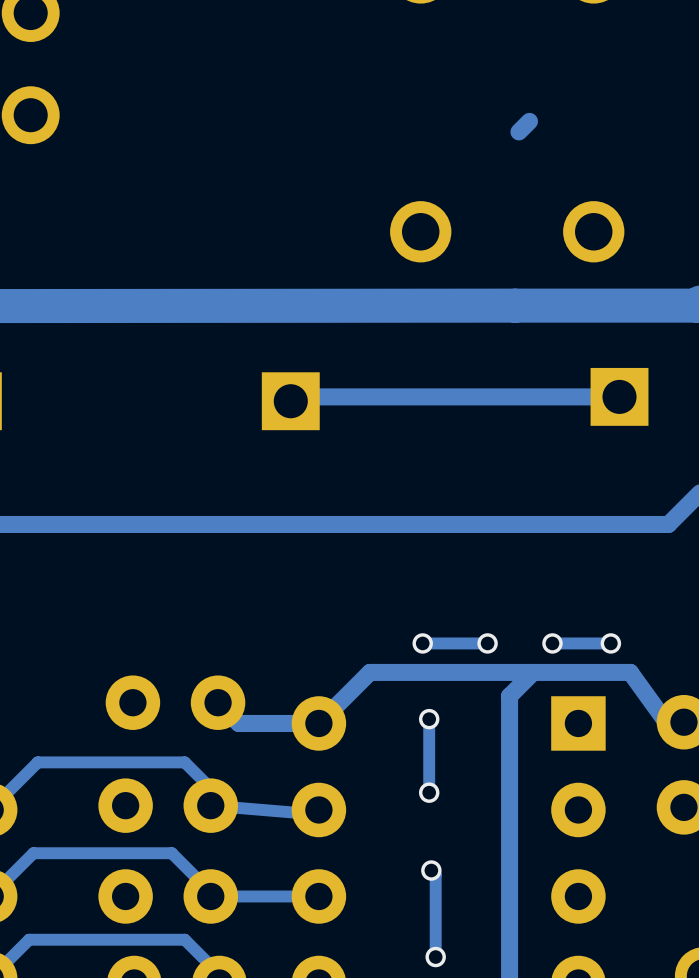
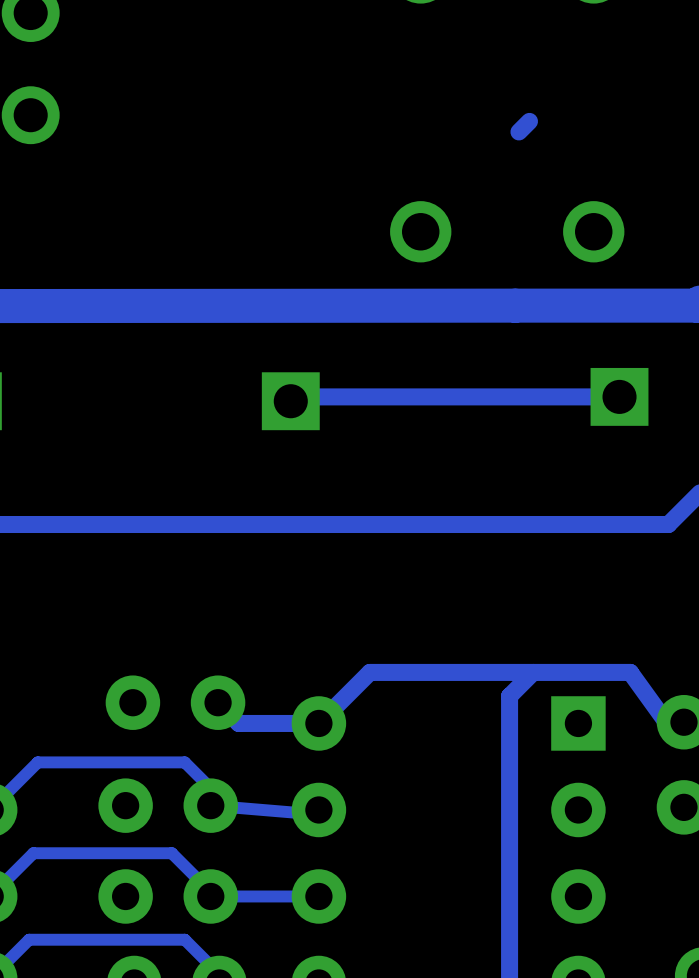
via: (422, 643) -> none
track: (487, 643) (422, 643) -> none
via: (487, 643) -> none
via: (552, 643) -> none
track: (610, 643) (552, 643) -> none
via: (610, 643) -> none
track: (429, 719) (429, 792) -> none
via: (429, 719) -> none
via: (429, 792) -> none
track: (431, 870) (435, 874) (435, 957) -> none
via: (431, 870) -> none
via: (435, 957) -> none

